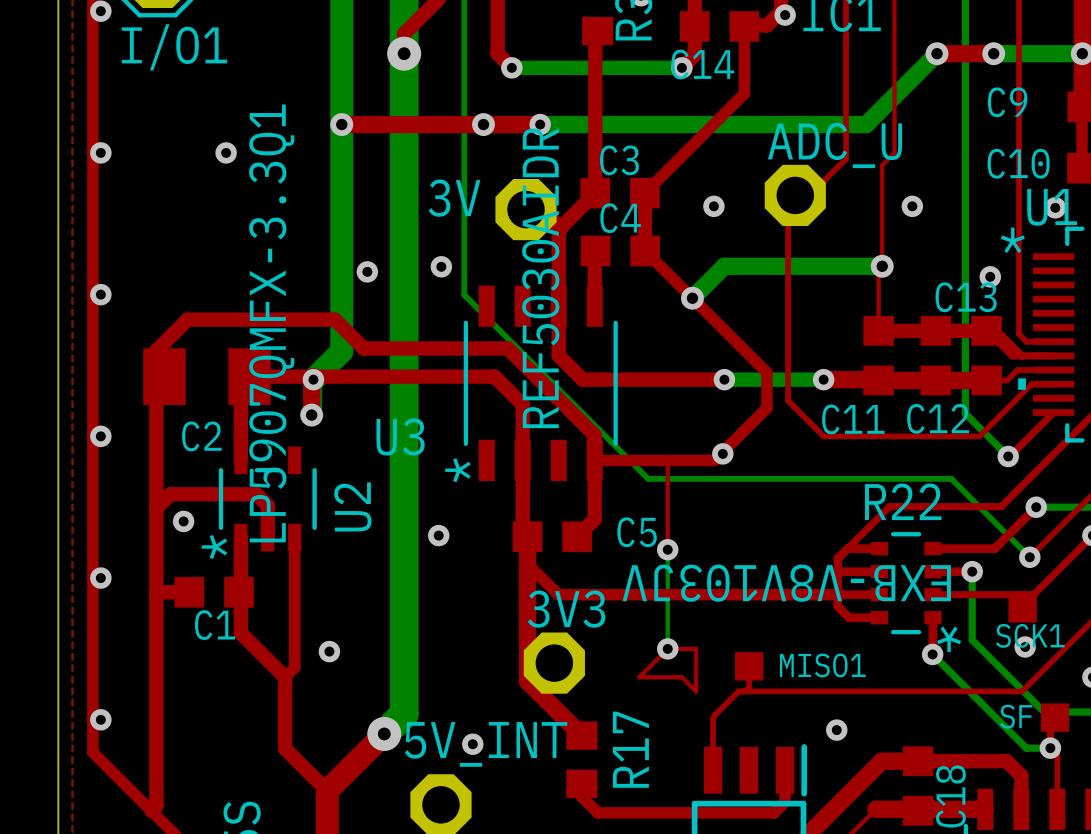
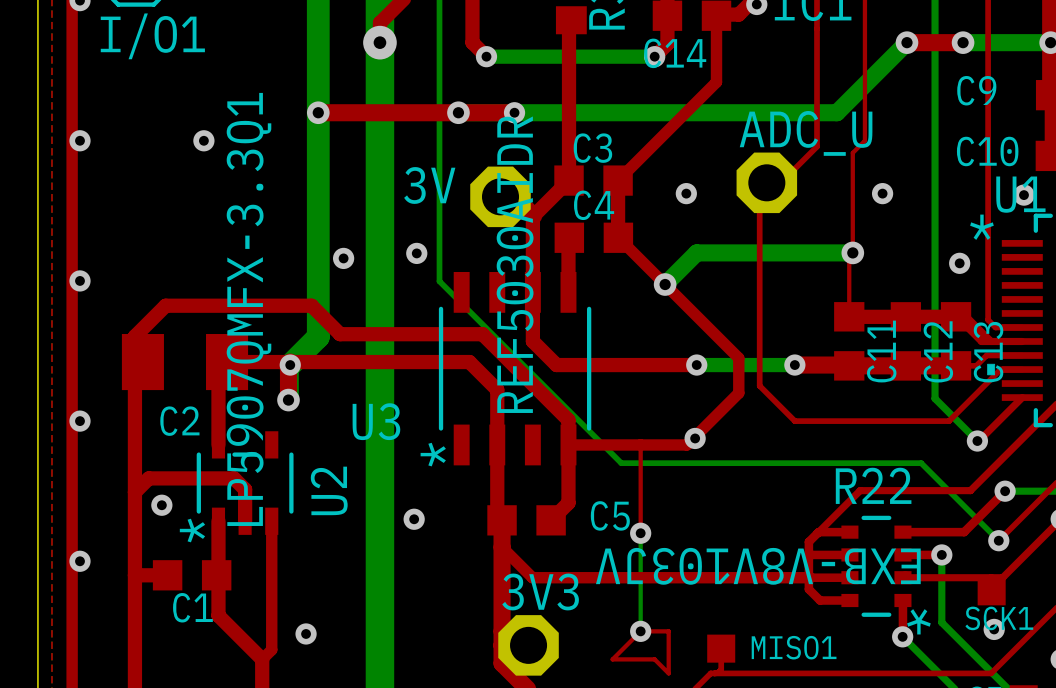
C13 name rotation: 0° (966, 297) -> 90° counterclockwise (988, 352)
C12 name rotation: 0° (938, 418) -> 90° counterclockwise (938, 351)
C11 name rotation: 0° (853, 419) -> 90° counterclockwise (881, 351)

